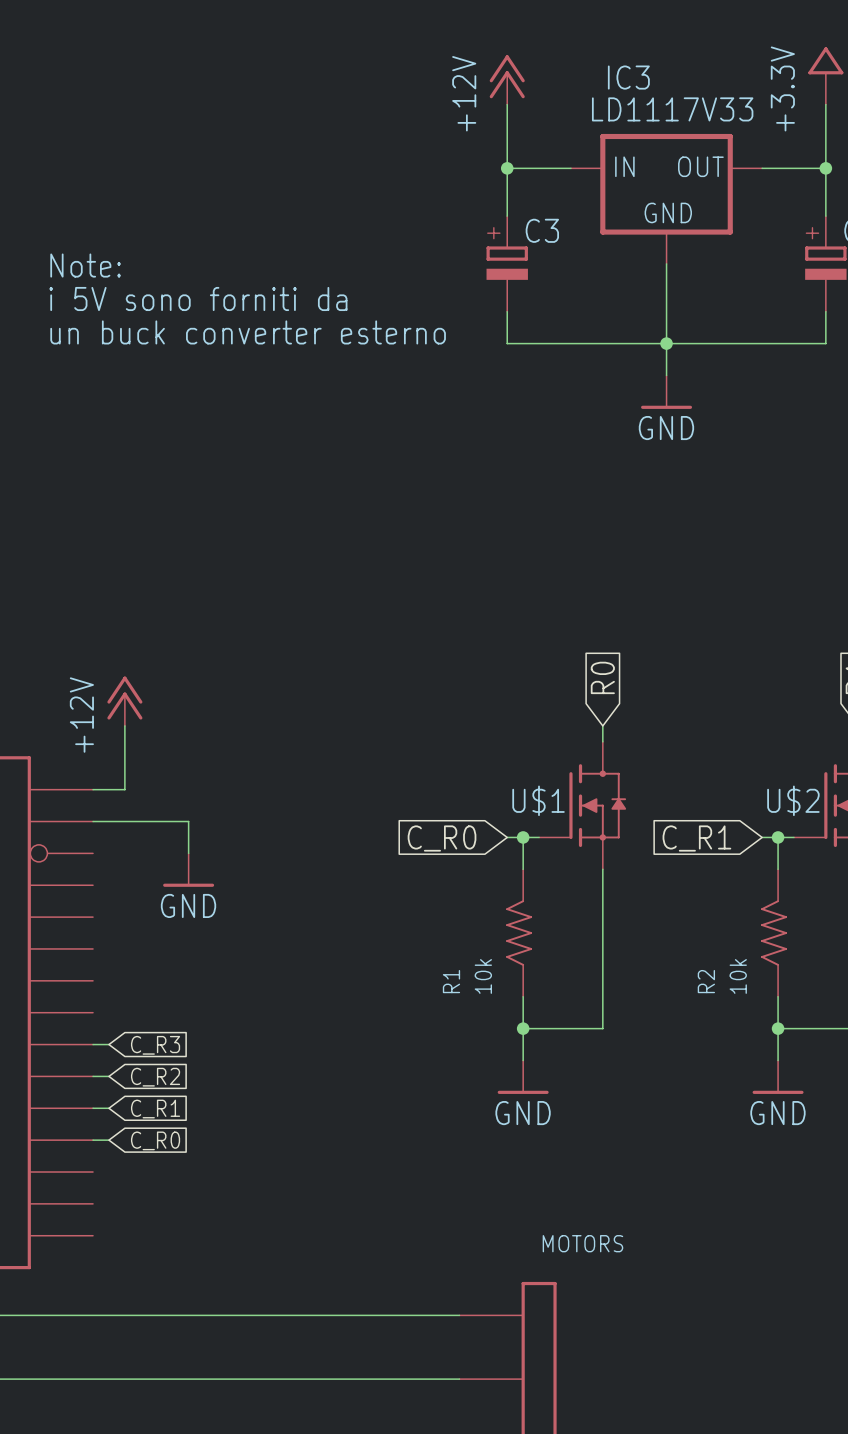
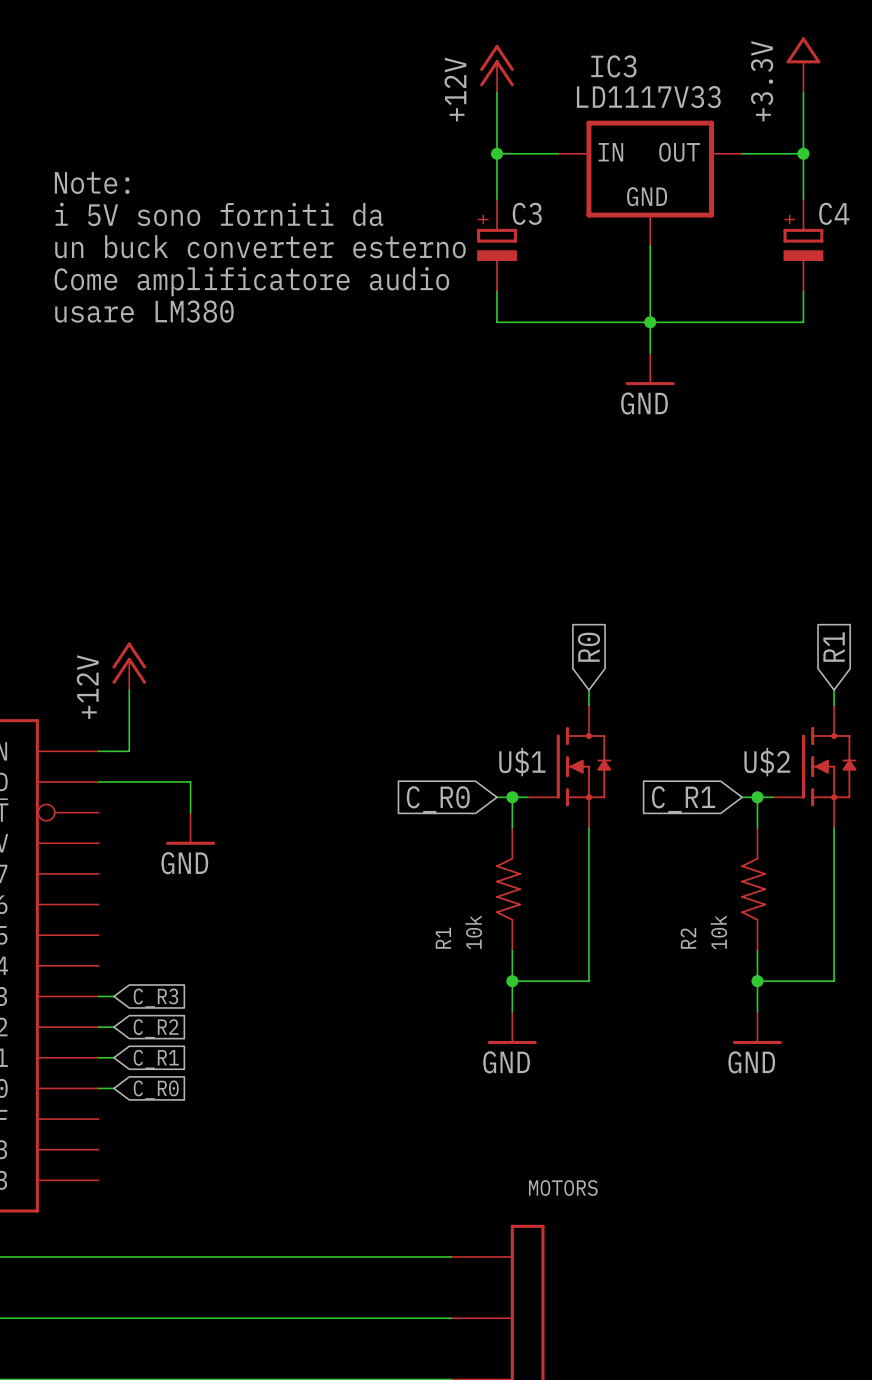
text: none -> Note: (92, 183)
text: none -> i 5V sono forniti da (219, 214)
text: Note: (85, 265) -> un buck converter esterno (260, 246)
text: i 5V sono forniti da (198, 298) -> Come amplificatore audio (251, 281)
text: un buck converter esterno (248, 332) -> usare LM380 (144, 311)

